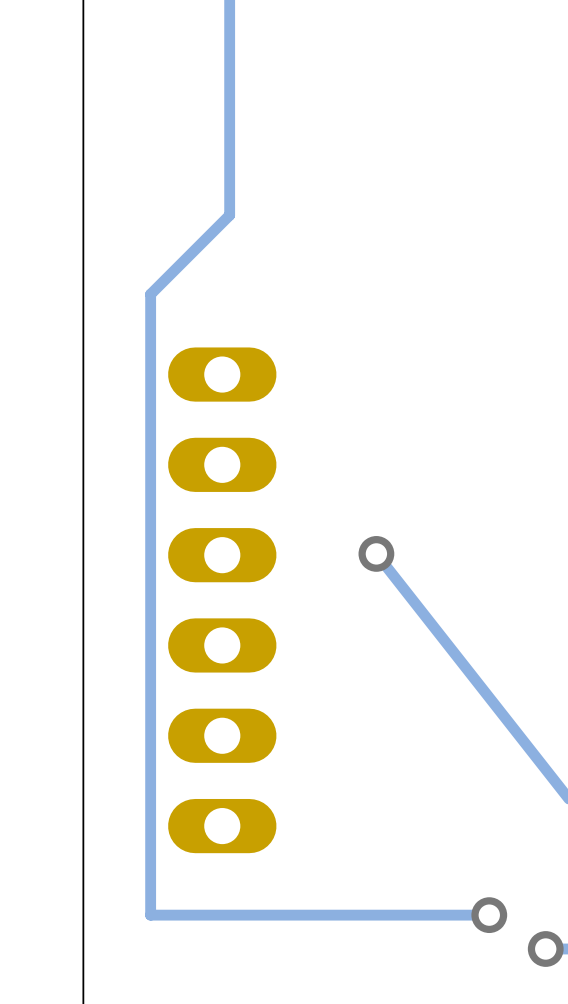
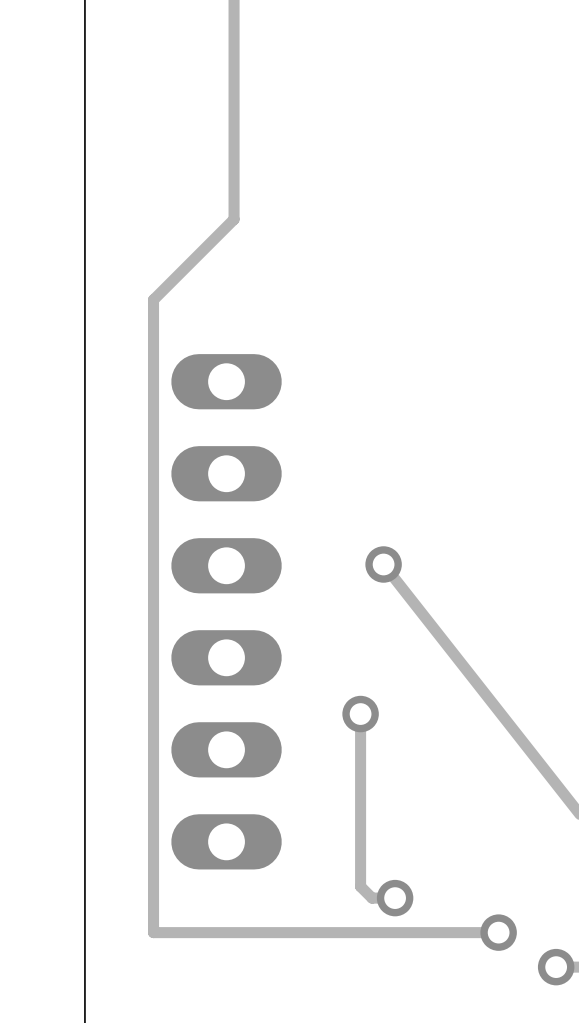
track: none -> (360, 714) (360, 886) (372, 898) (395, 898)
via: none -> (360, 714)
via: none -> (395, 898)

